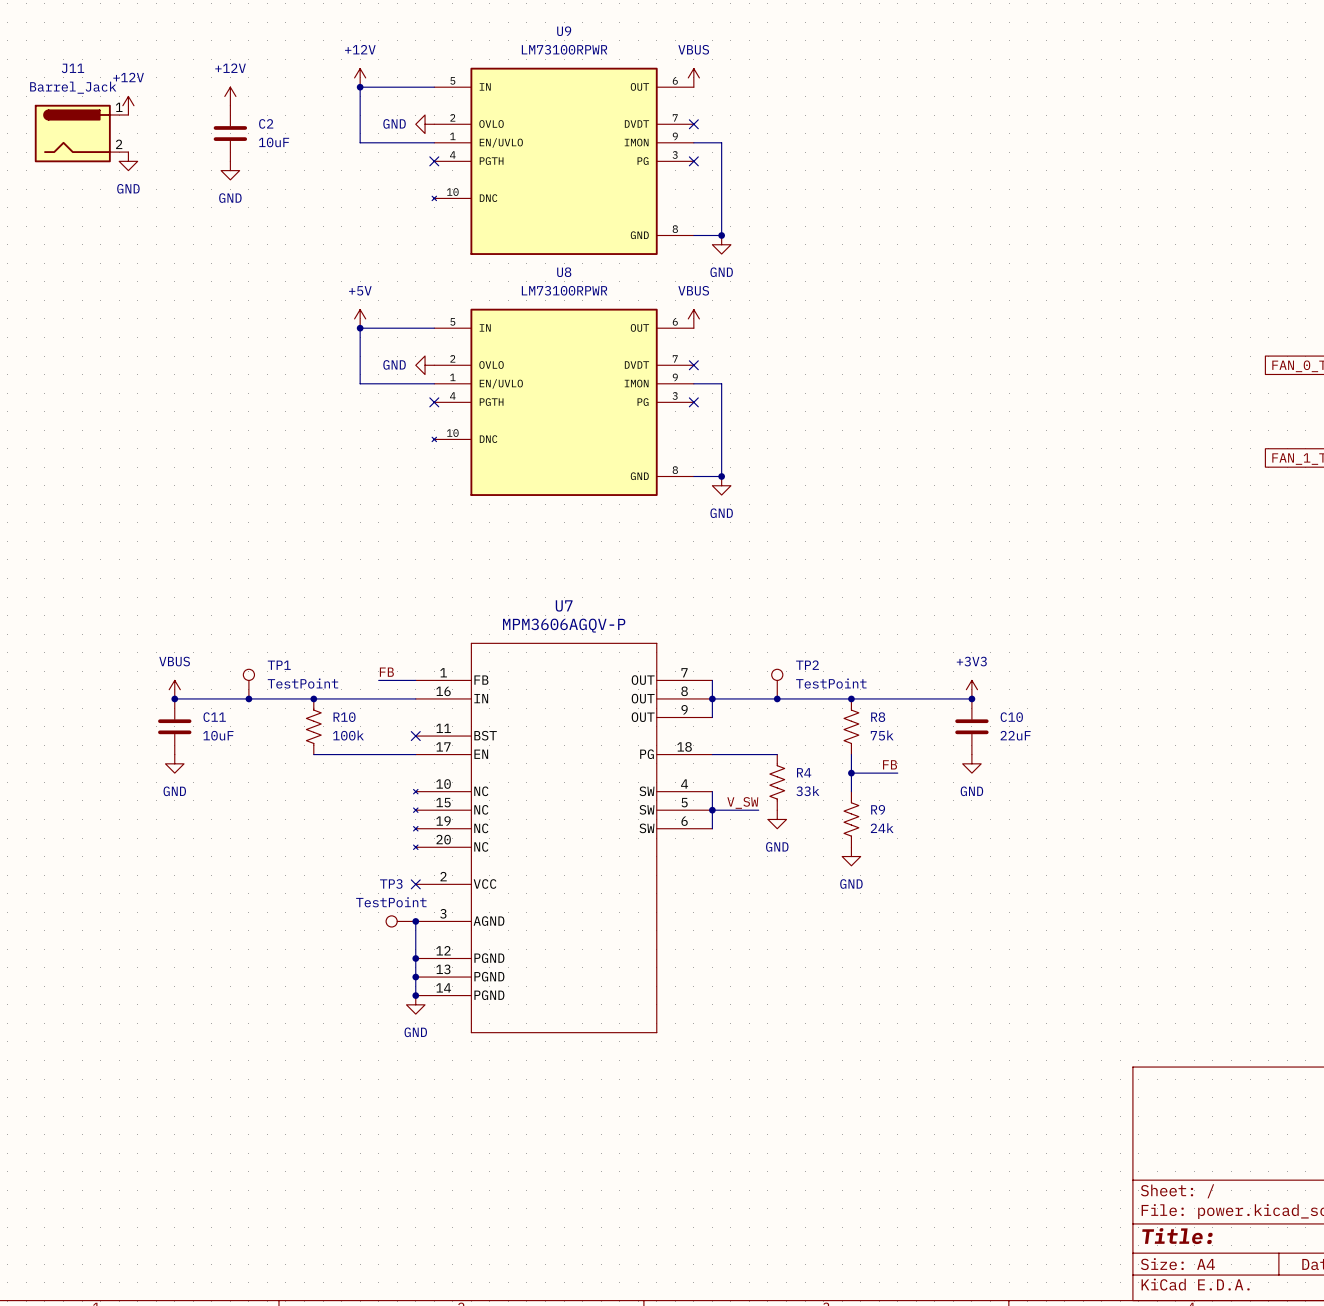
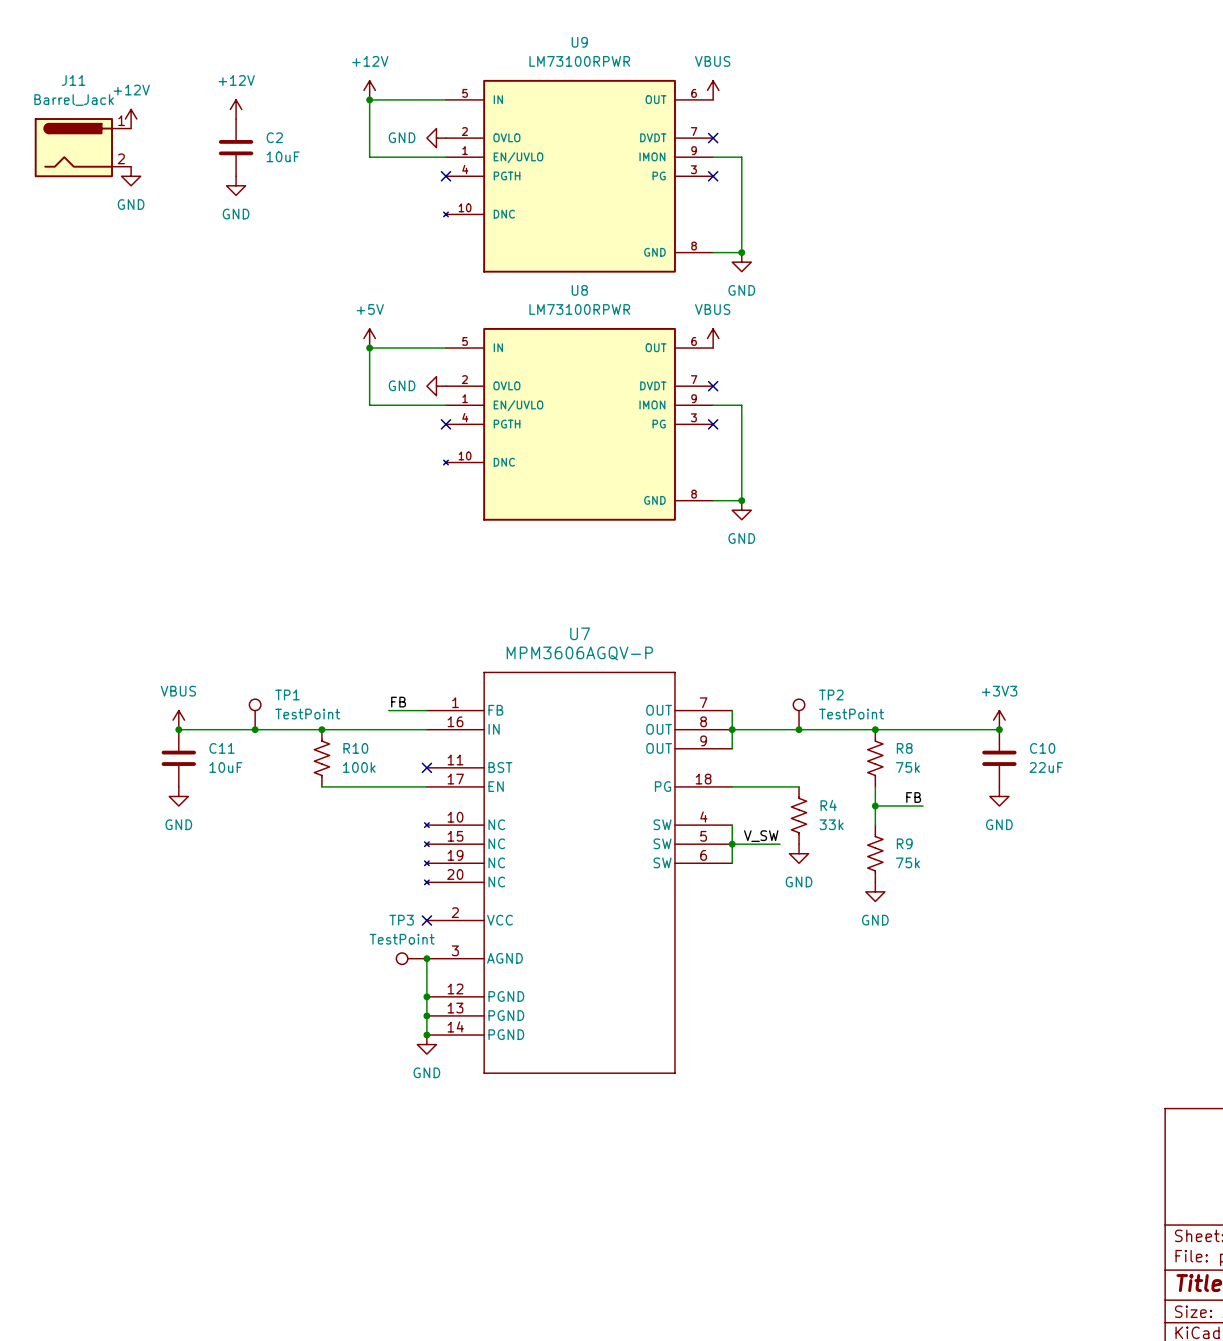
R9 value: 24k (882, 828) -> 75k (907, 862)

